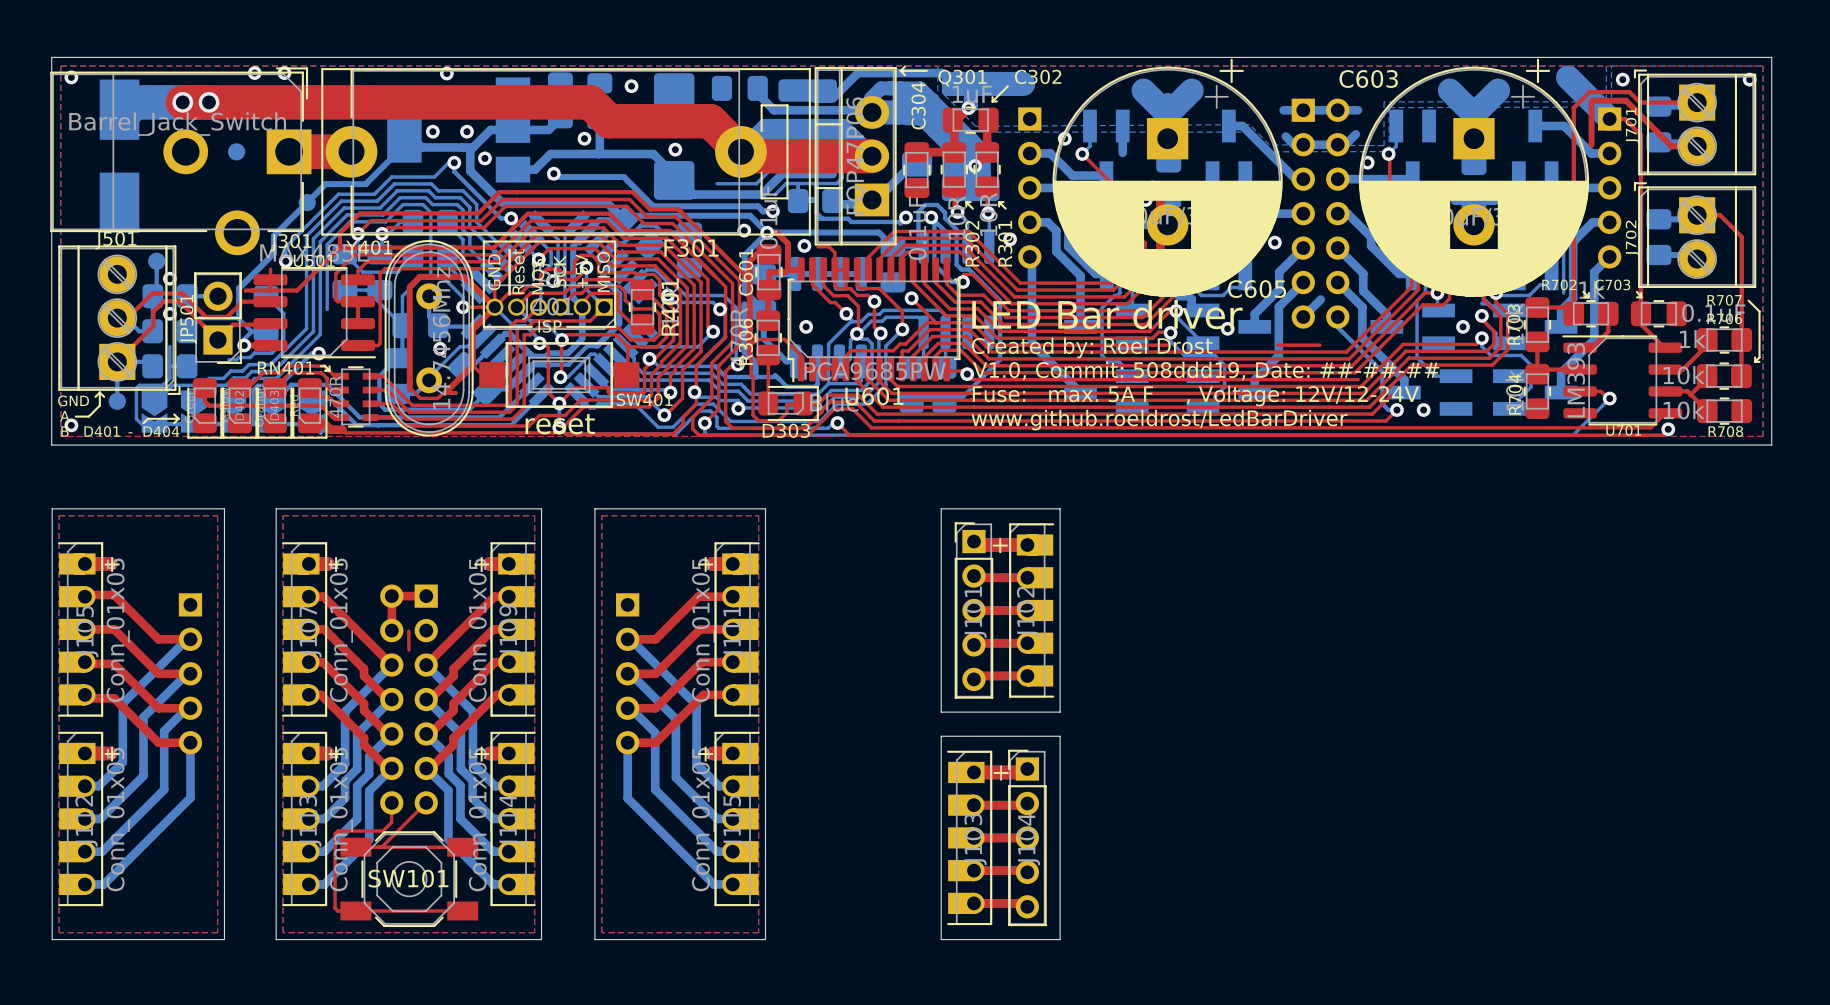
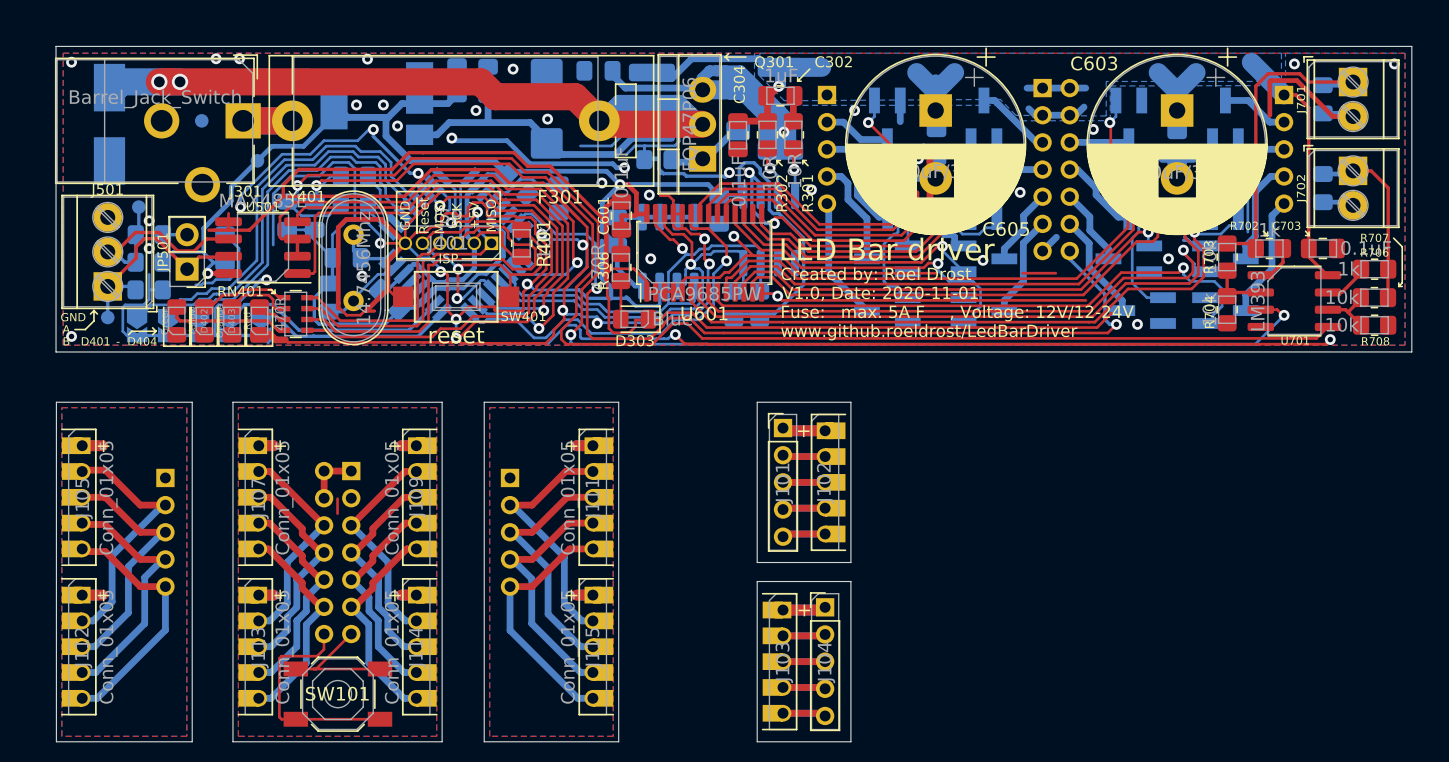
text: V1.0, Commit: 508ddd19, Date: ##-##-## (1206, 370) -> V1.0, Date: 2020-11-01 (880, 293)

